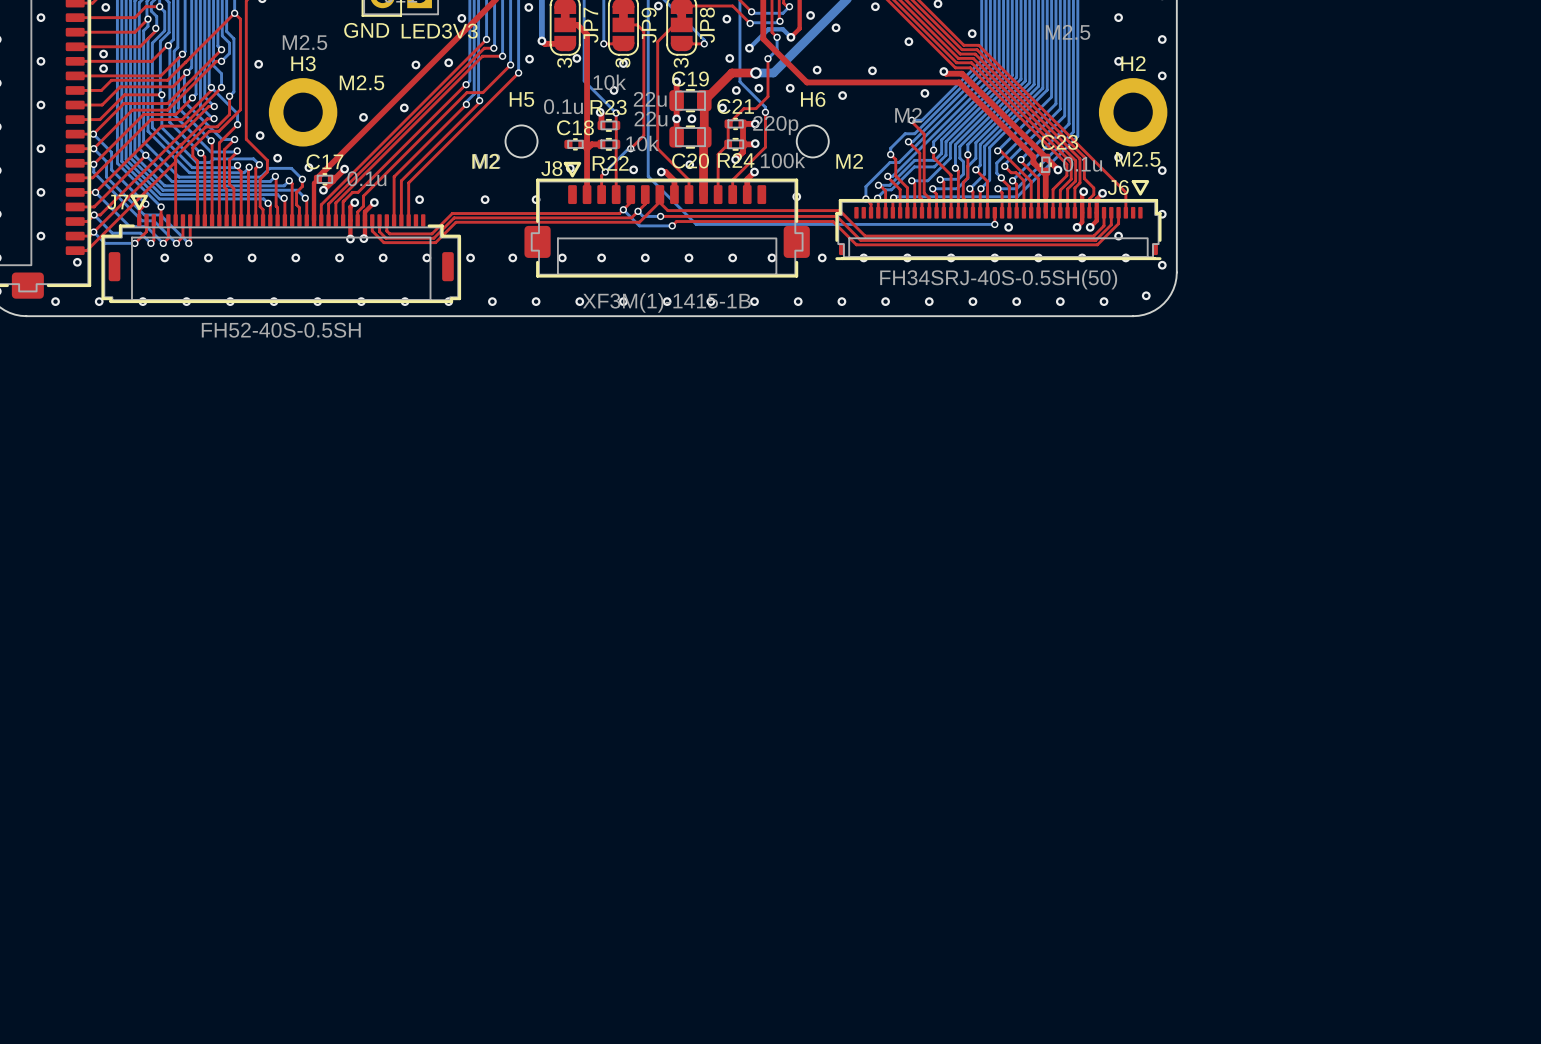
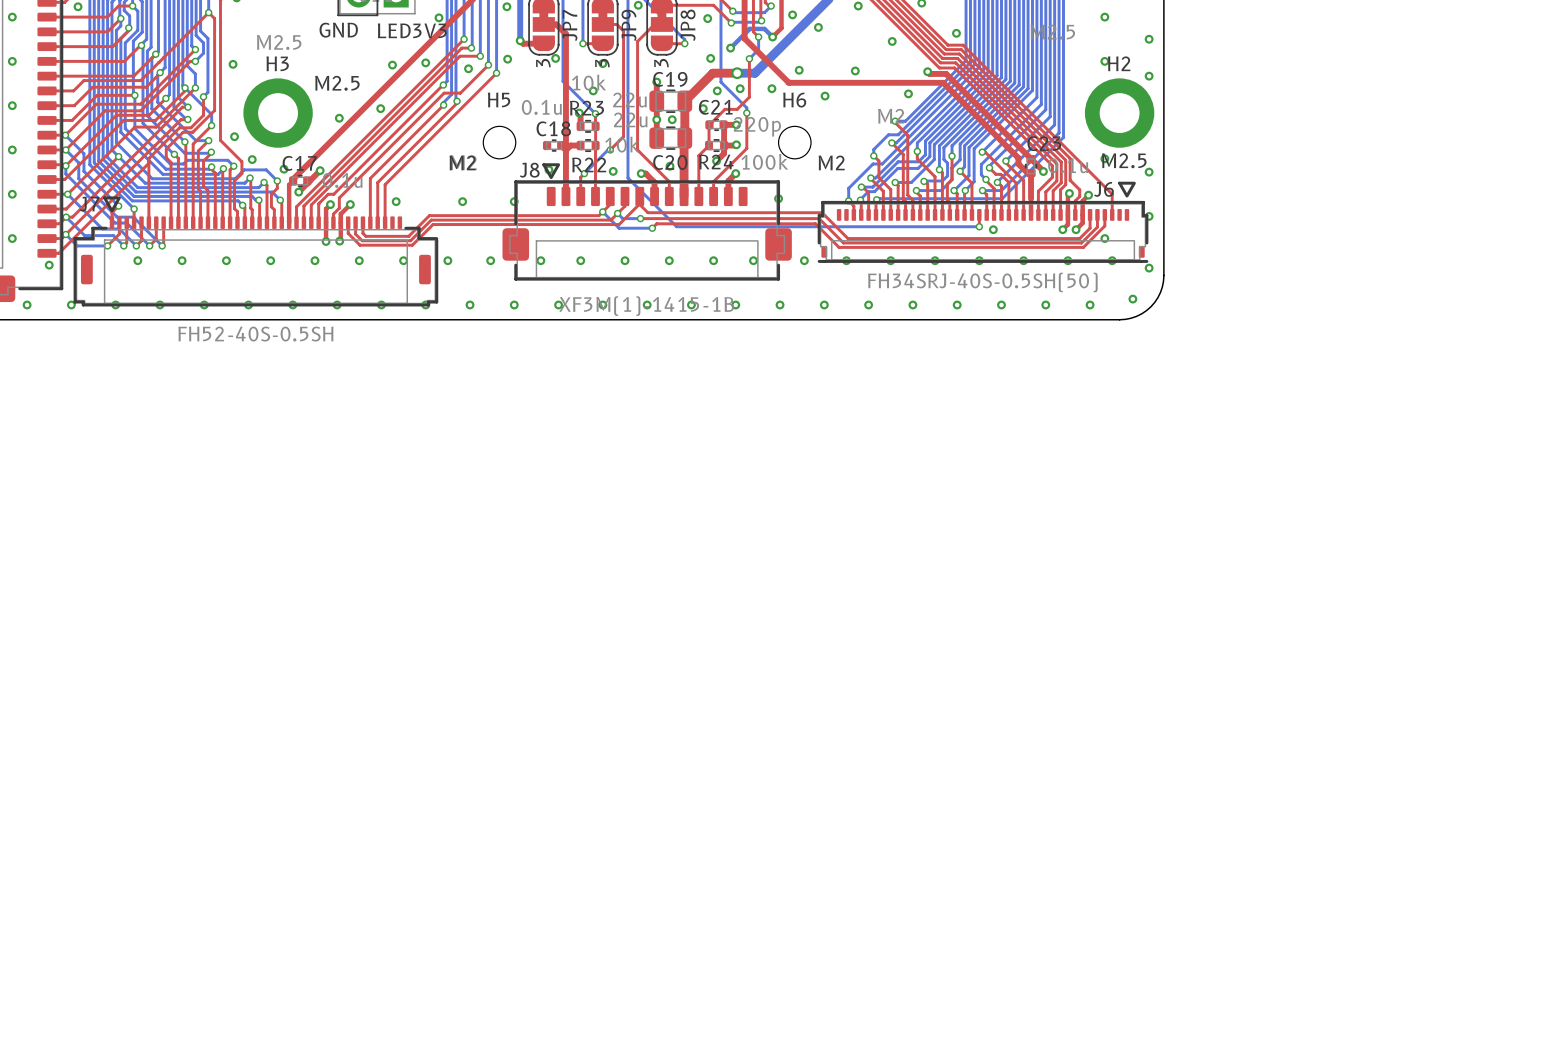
via: (103, 54) -> none
via: (103, 68) -> none
via: none -> (468, 68)

